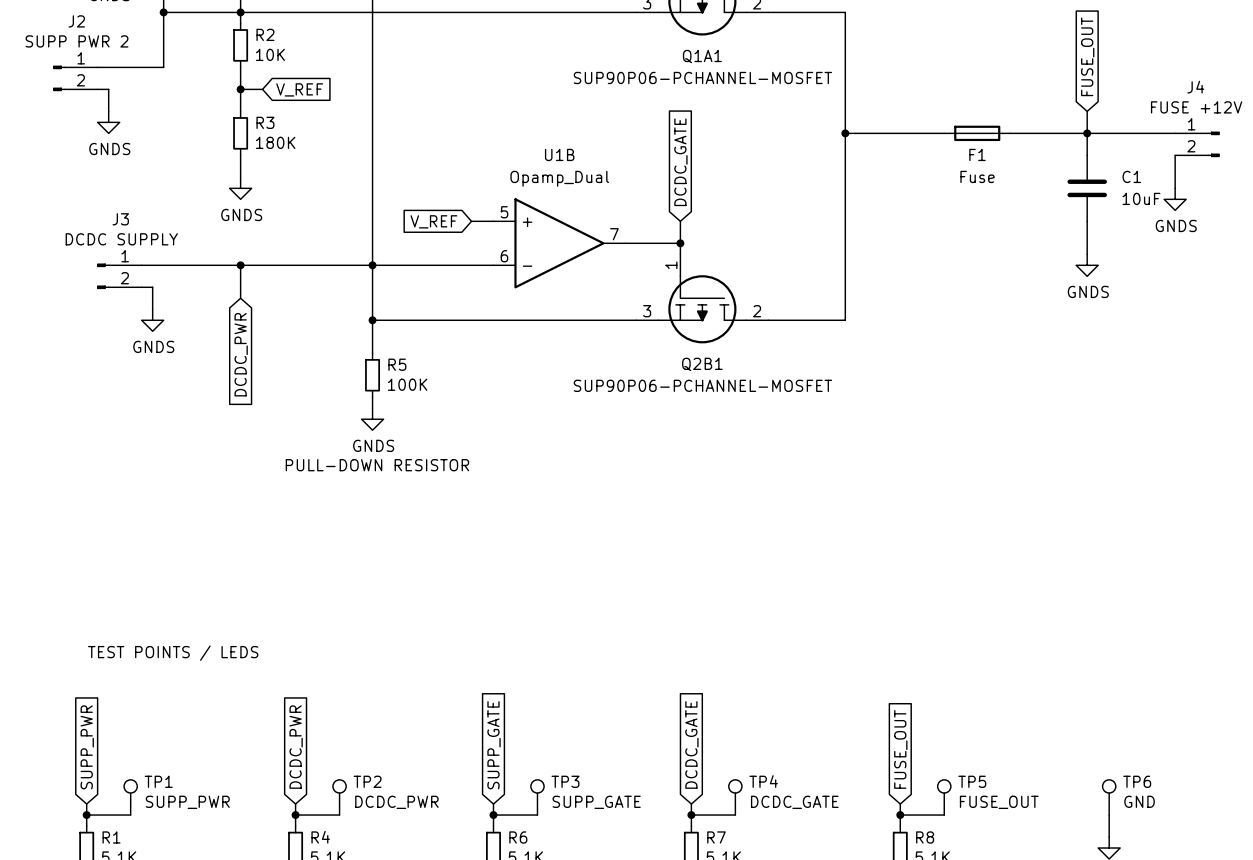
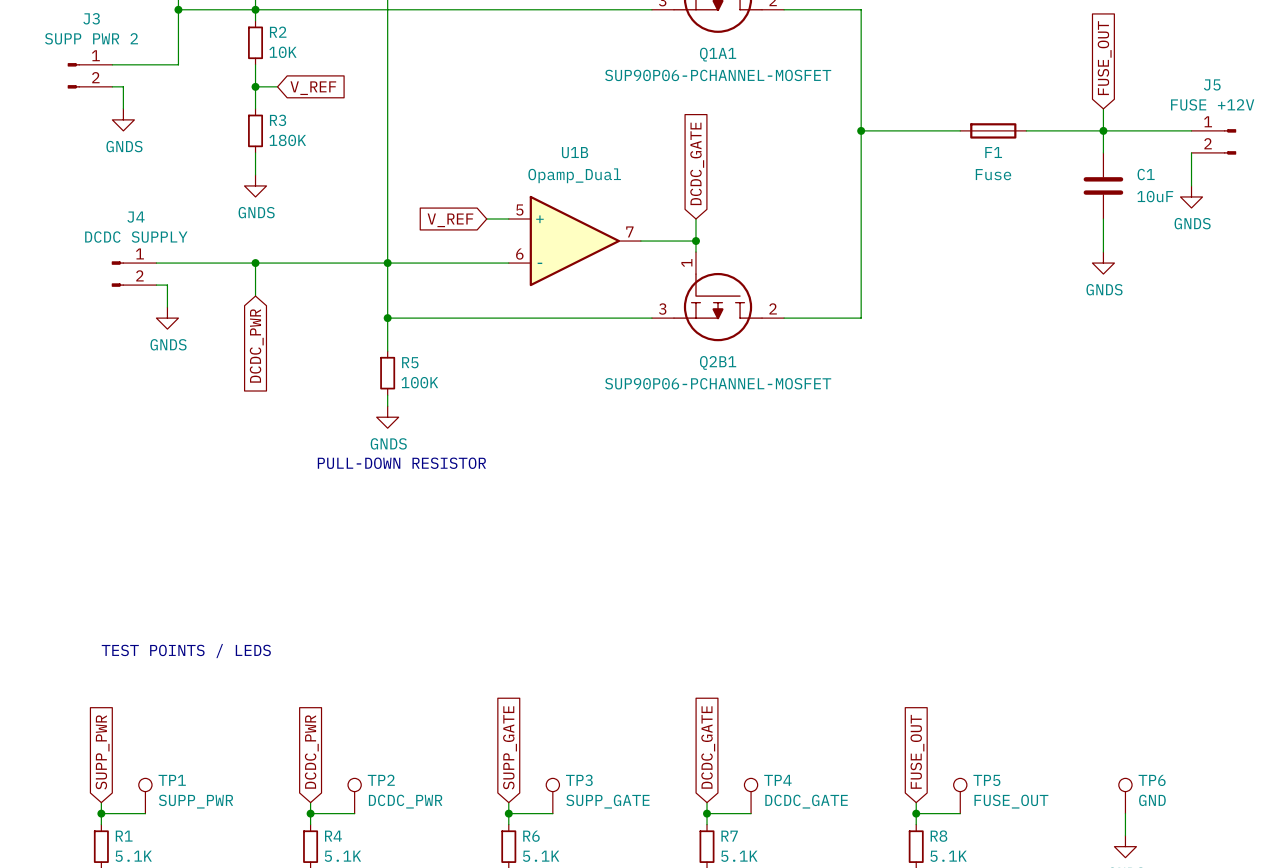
J2 name: J2 (76, 21) -> J3 (91, 18)
J4 name: J4 (1195, 87) -> J5 (1212, 84)
J3 name: J3 (120, 219) -> J4 (136, 217)

